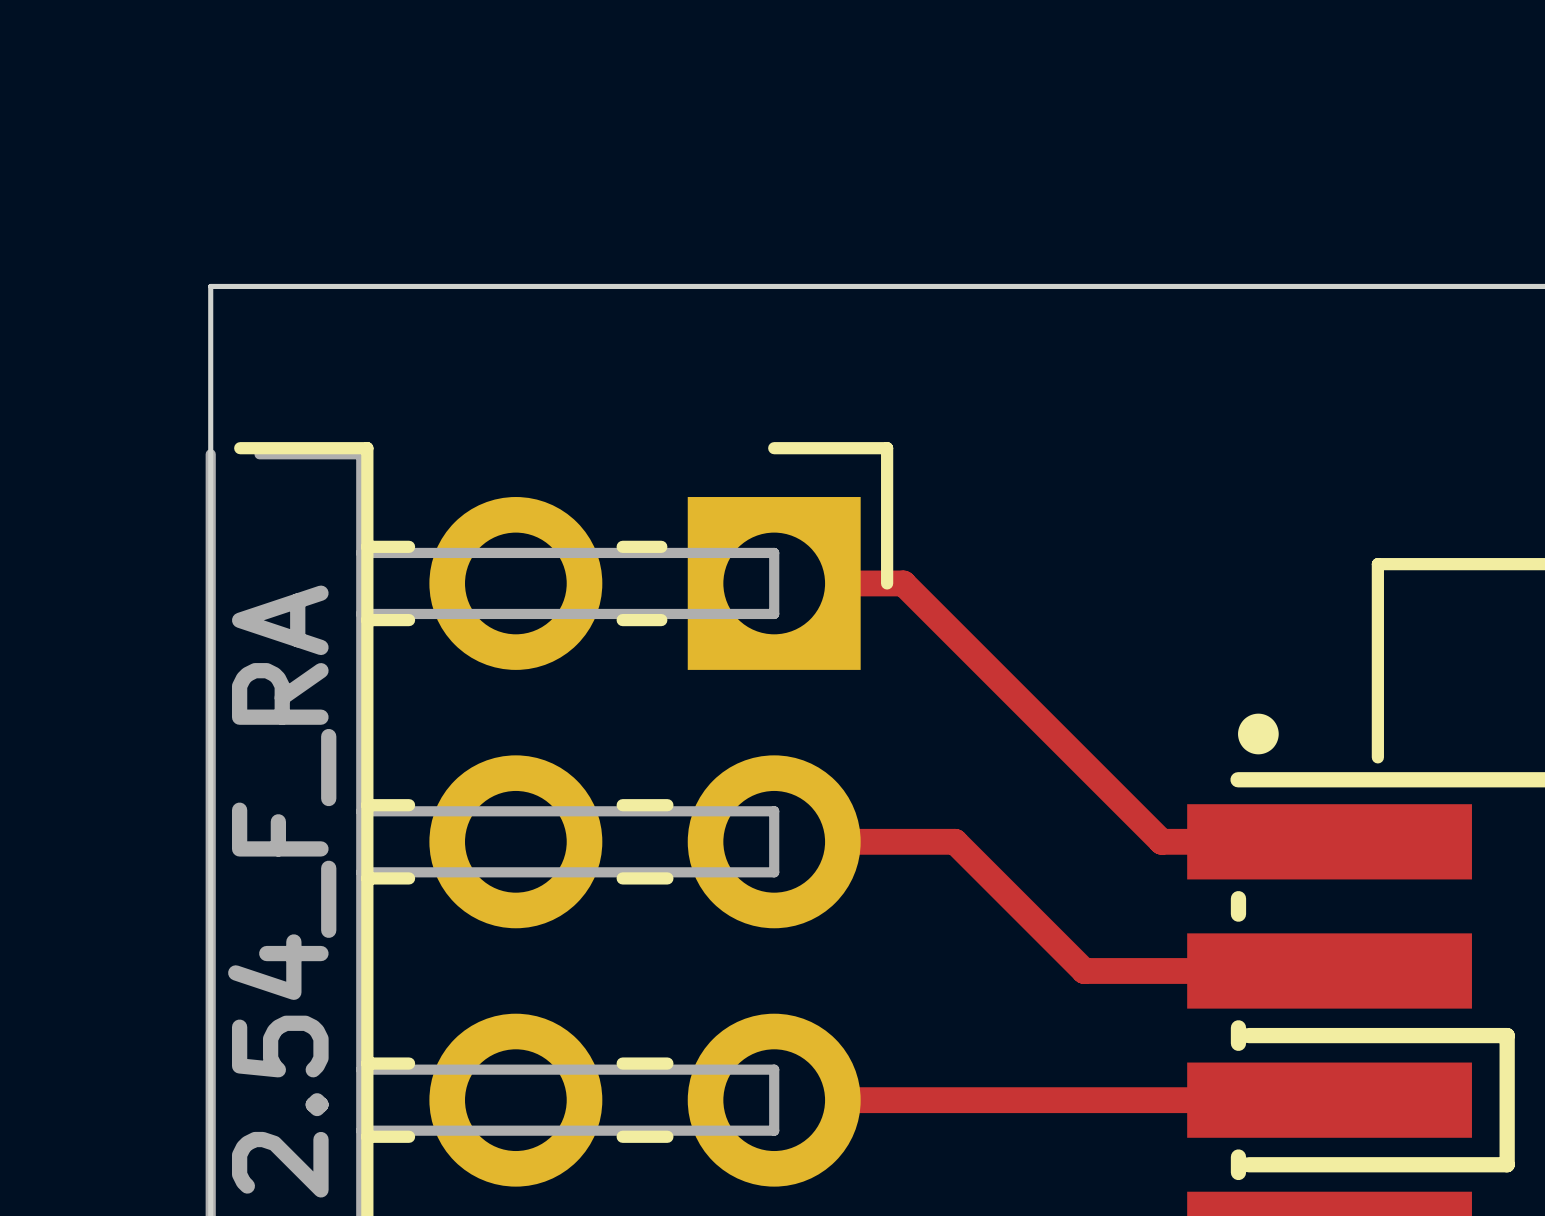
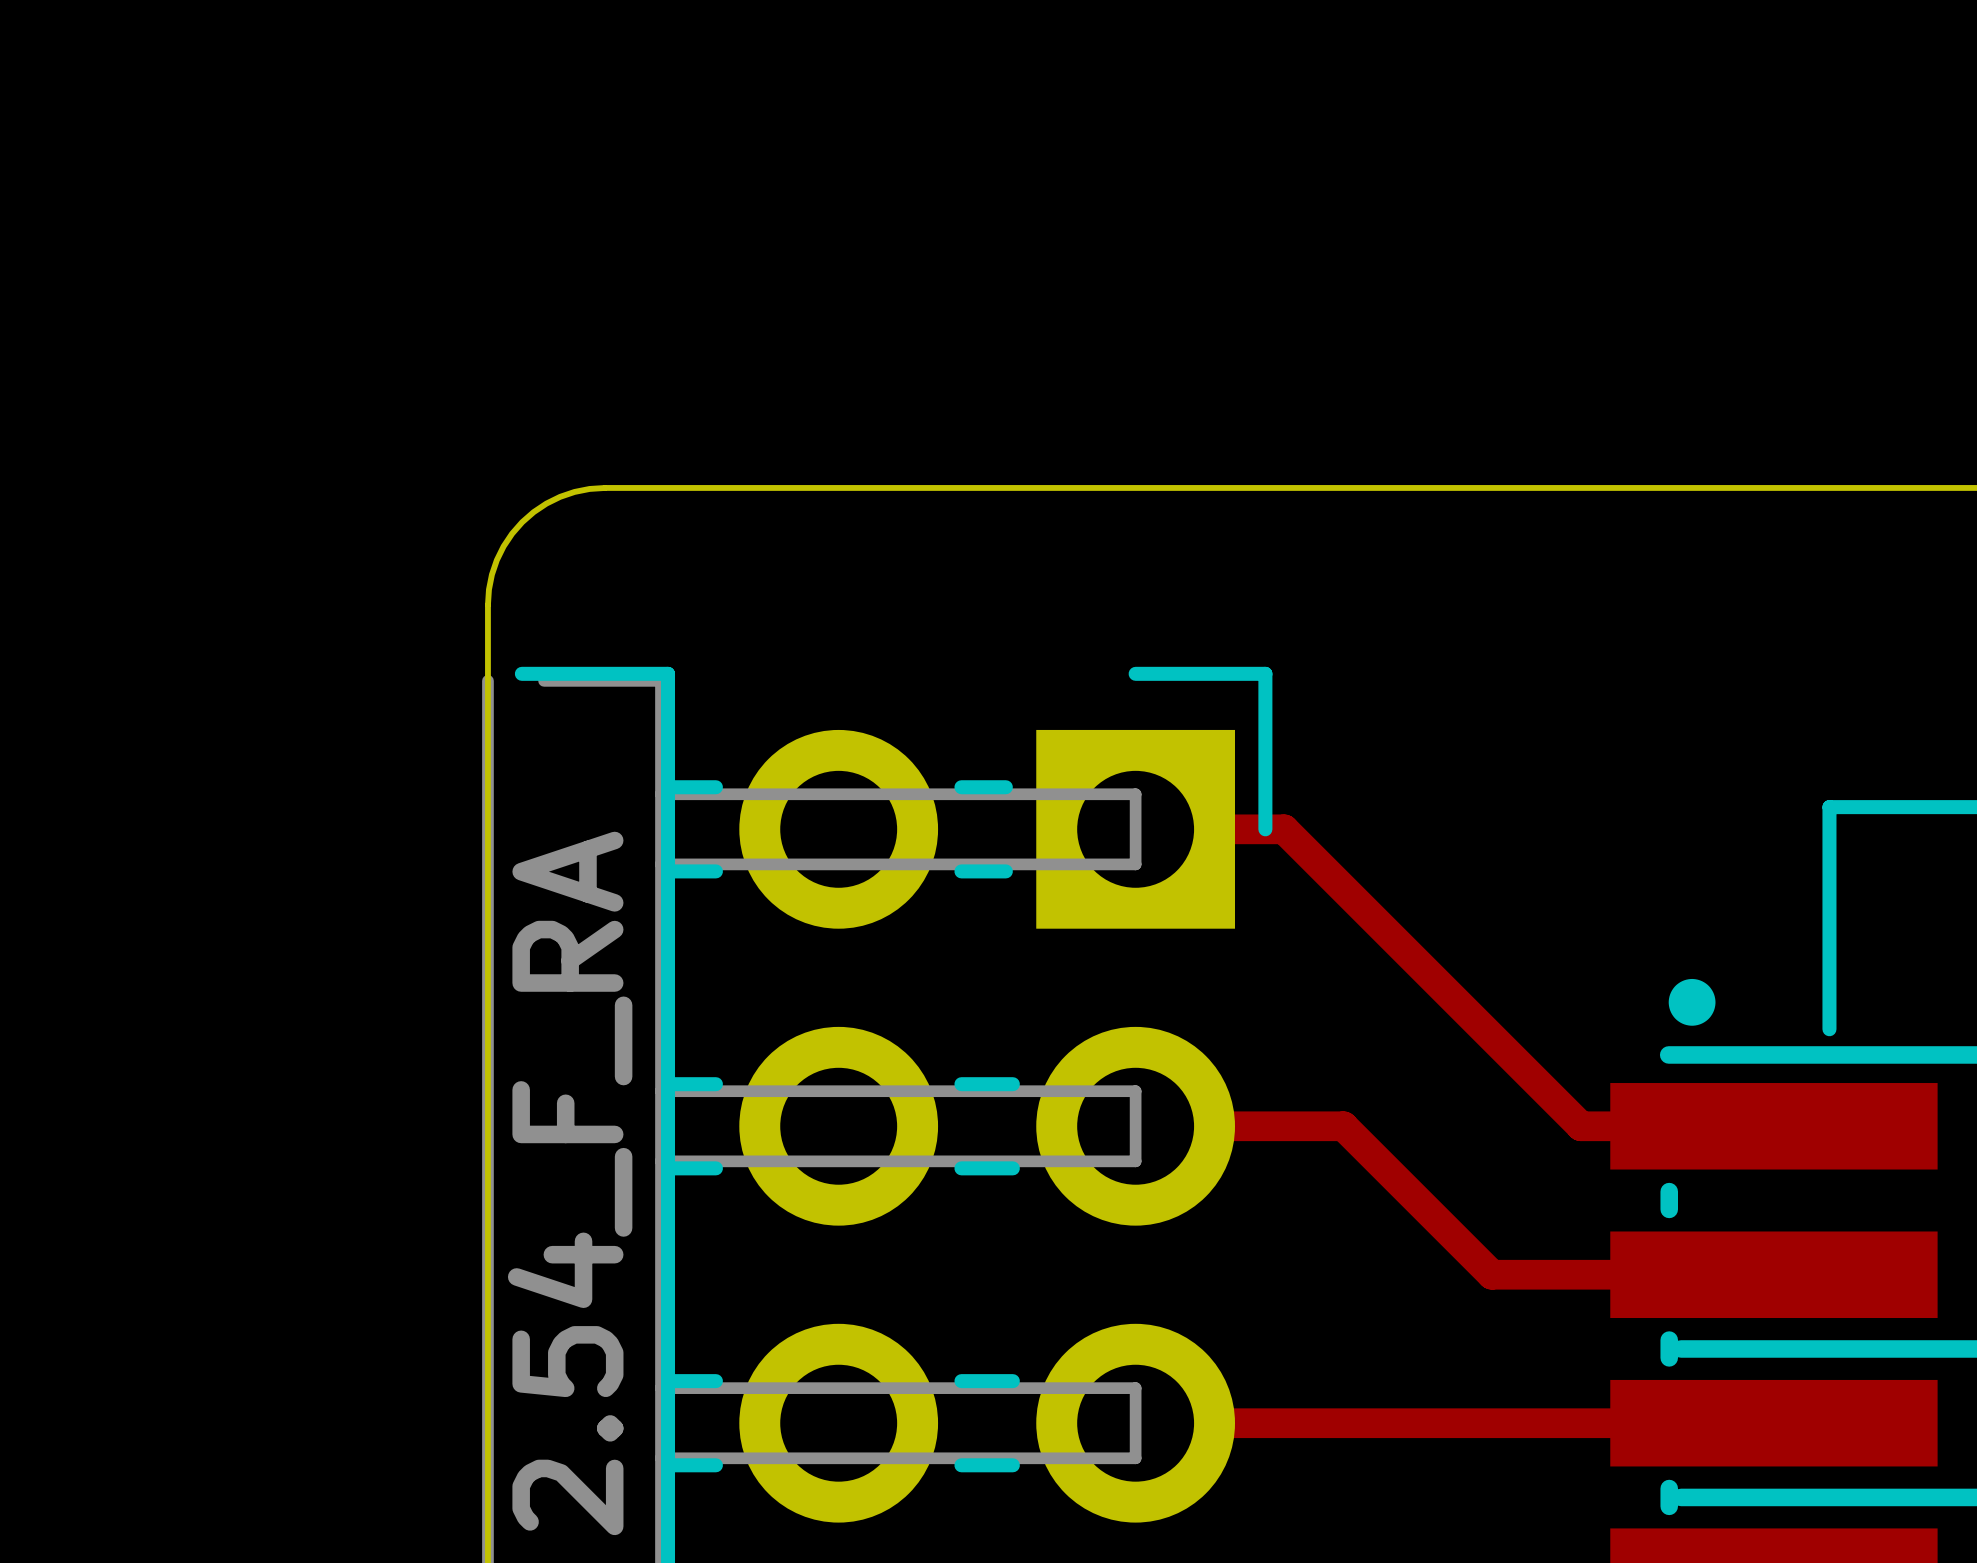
board edge: (312, 286) (210, 286) (210, 388) -> (604, 487) (589, 488) (560, 496) (533, 512) (522, 522) (503, 546) (496, 560) (488, 589) (487, 604)

